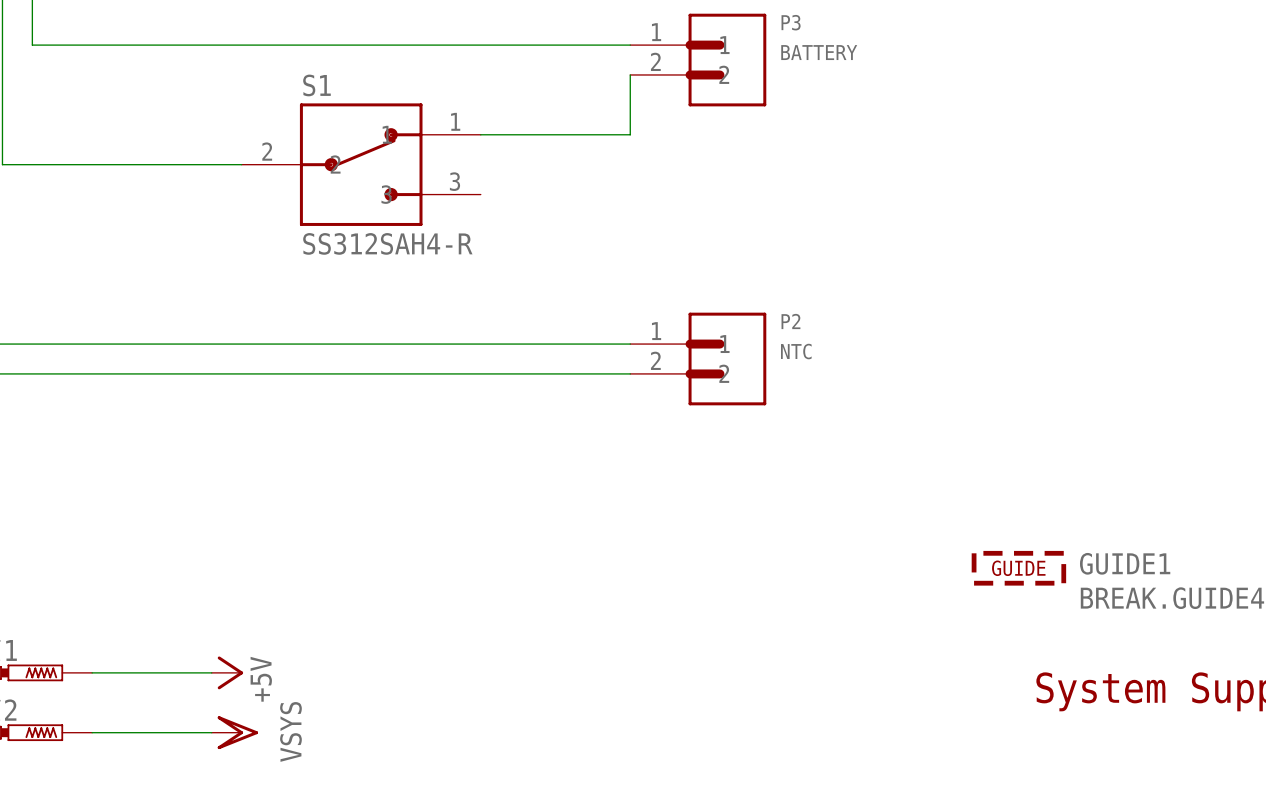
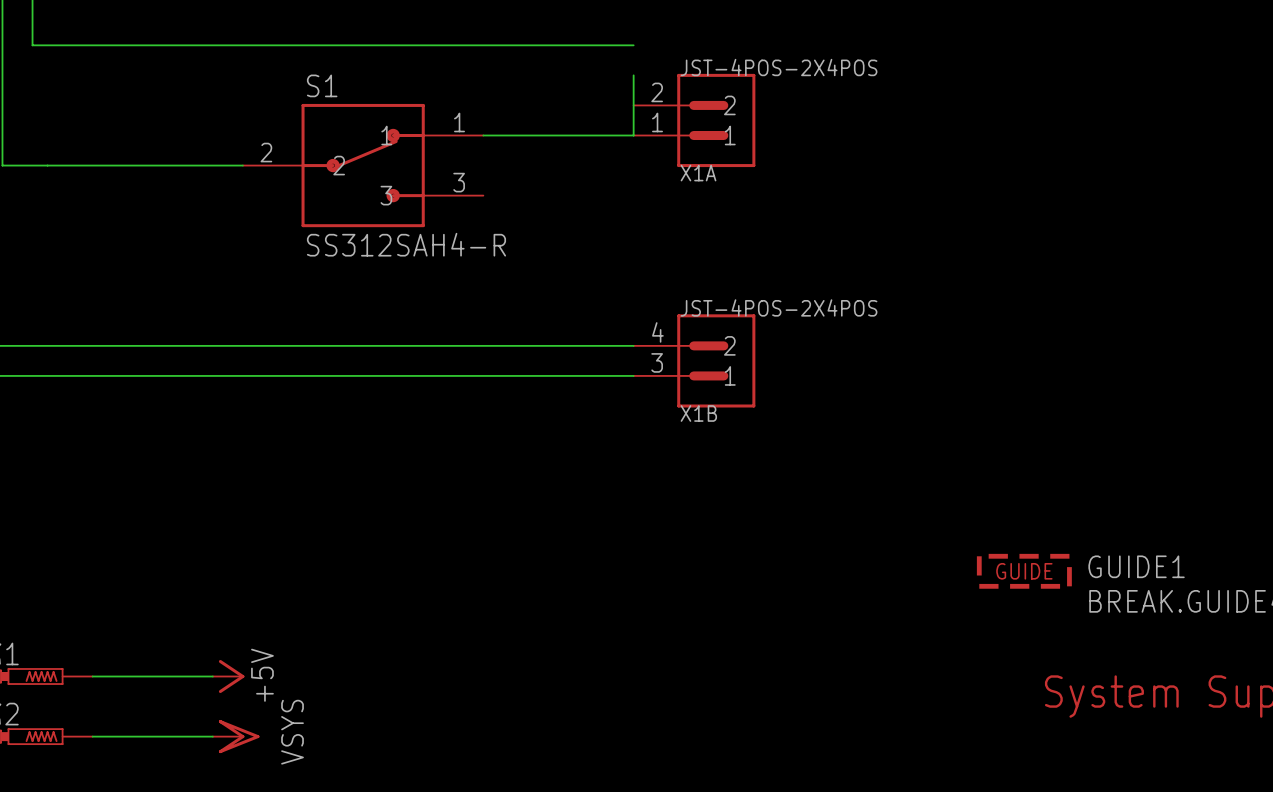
P3: BATTERY (698, 60) -> none
X1A: none -> JST-4POS-2X4POS (694, 120)
X1B: none -> JST-4POS-2X4POS (694, 360)
P2: NTC (698, 358) -> none

